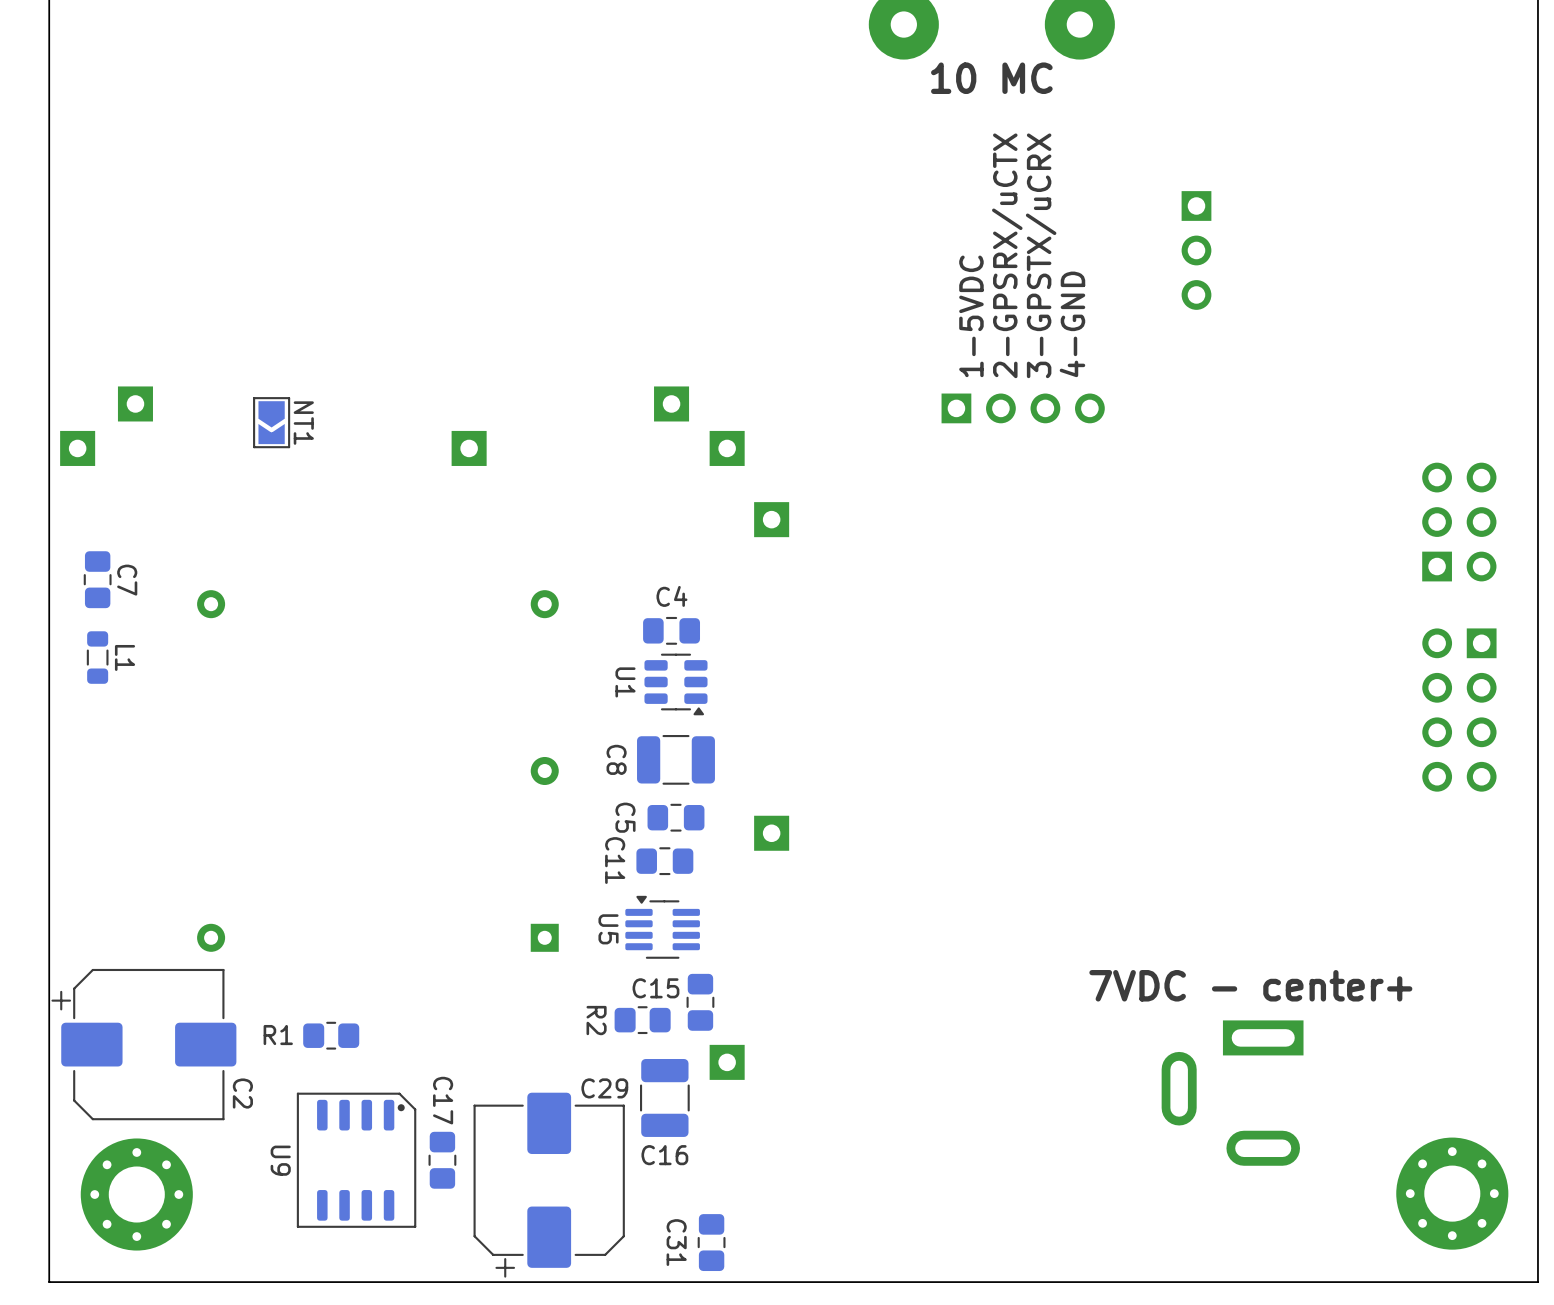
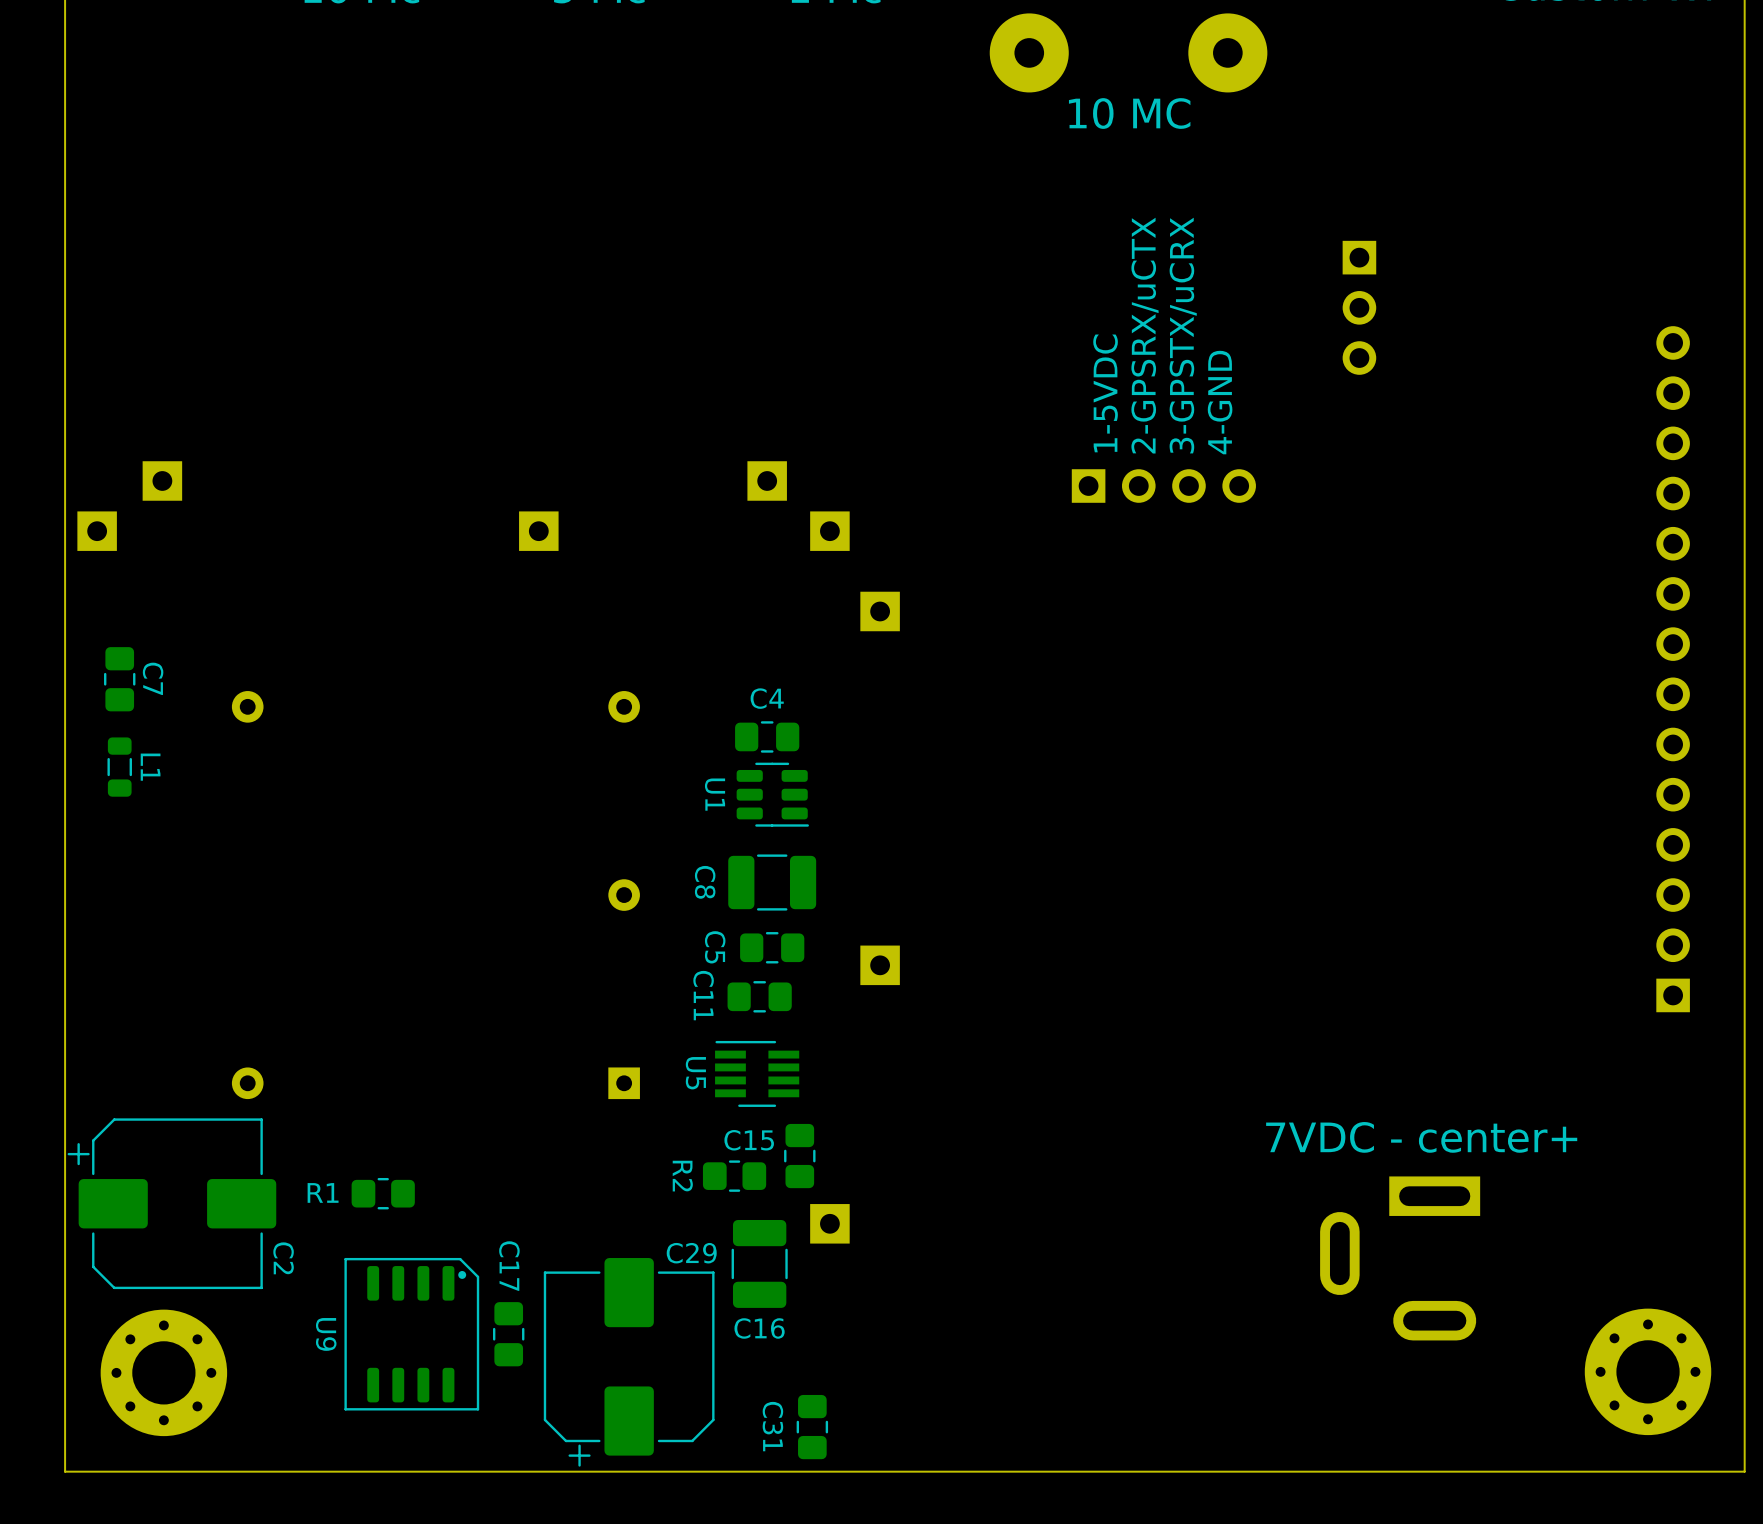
NT1: (271, 422) -> none
part: (1459, 522) -> none
part: none -> (1673, 669)
U1 footprint: [644, 653, 708, 716] -> [736, 762, 809, 827]
part: (1459, 710) -> none
U5 footprint: [625, 895, 700, 959] -> [715, 1040, 800, 1107]

